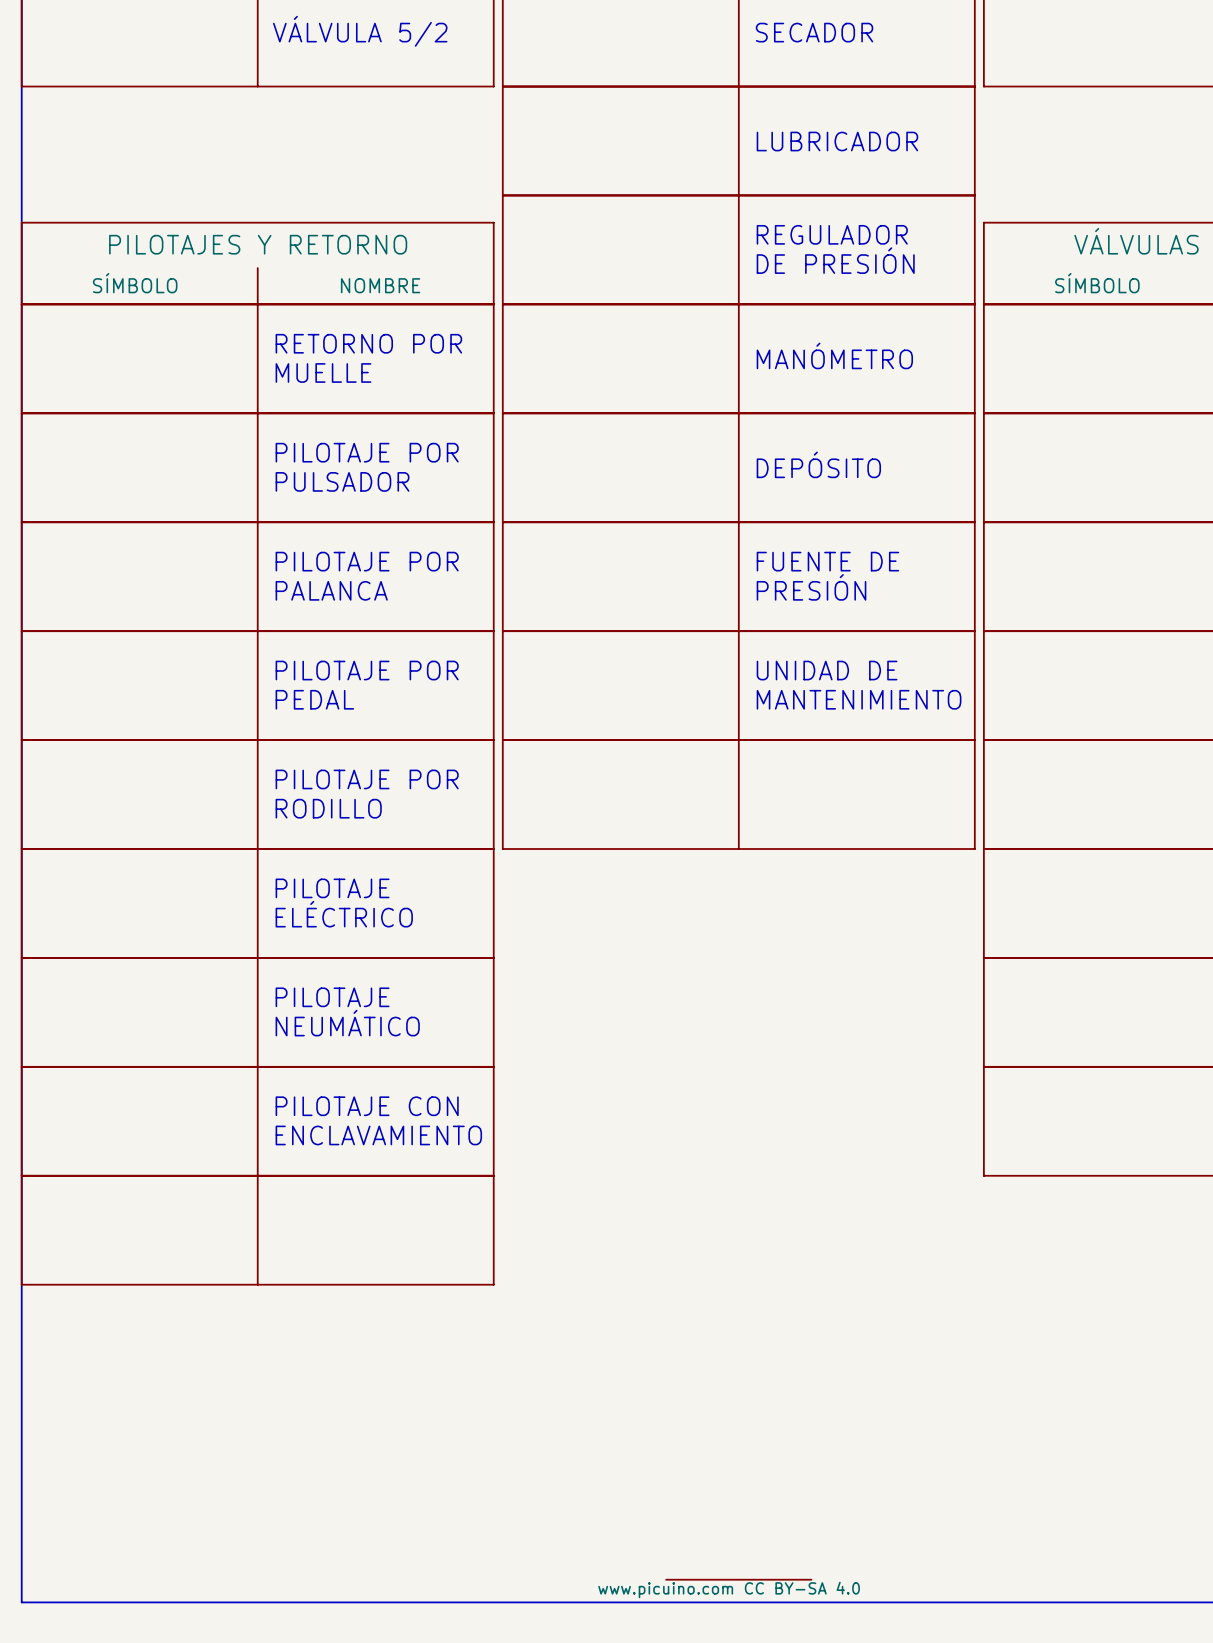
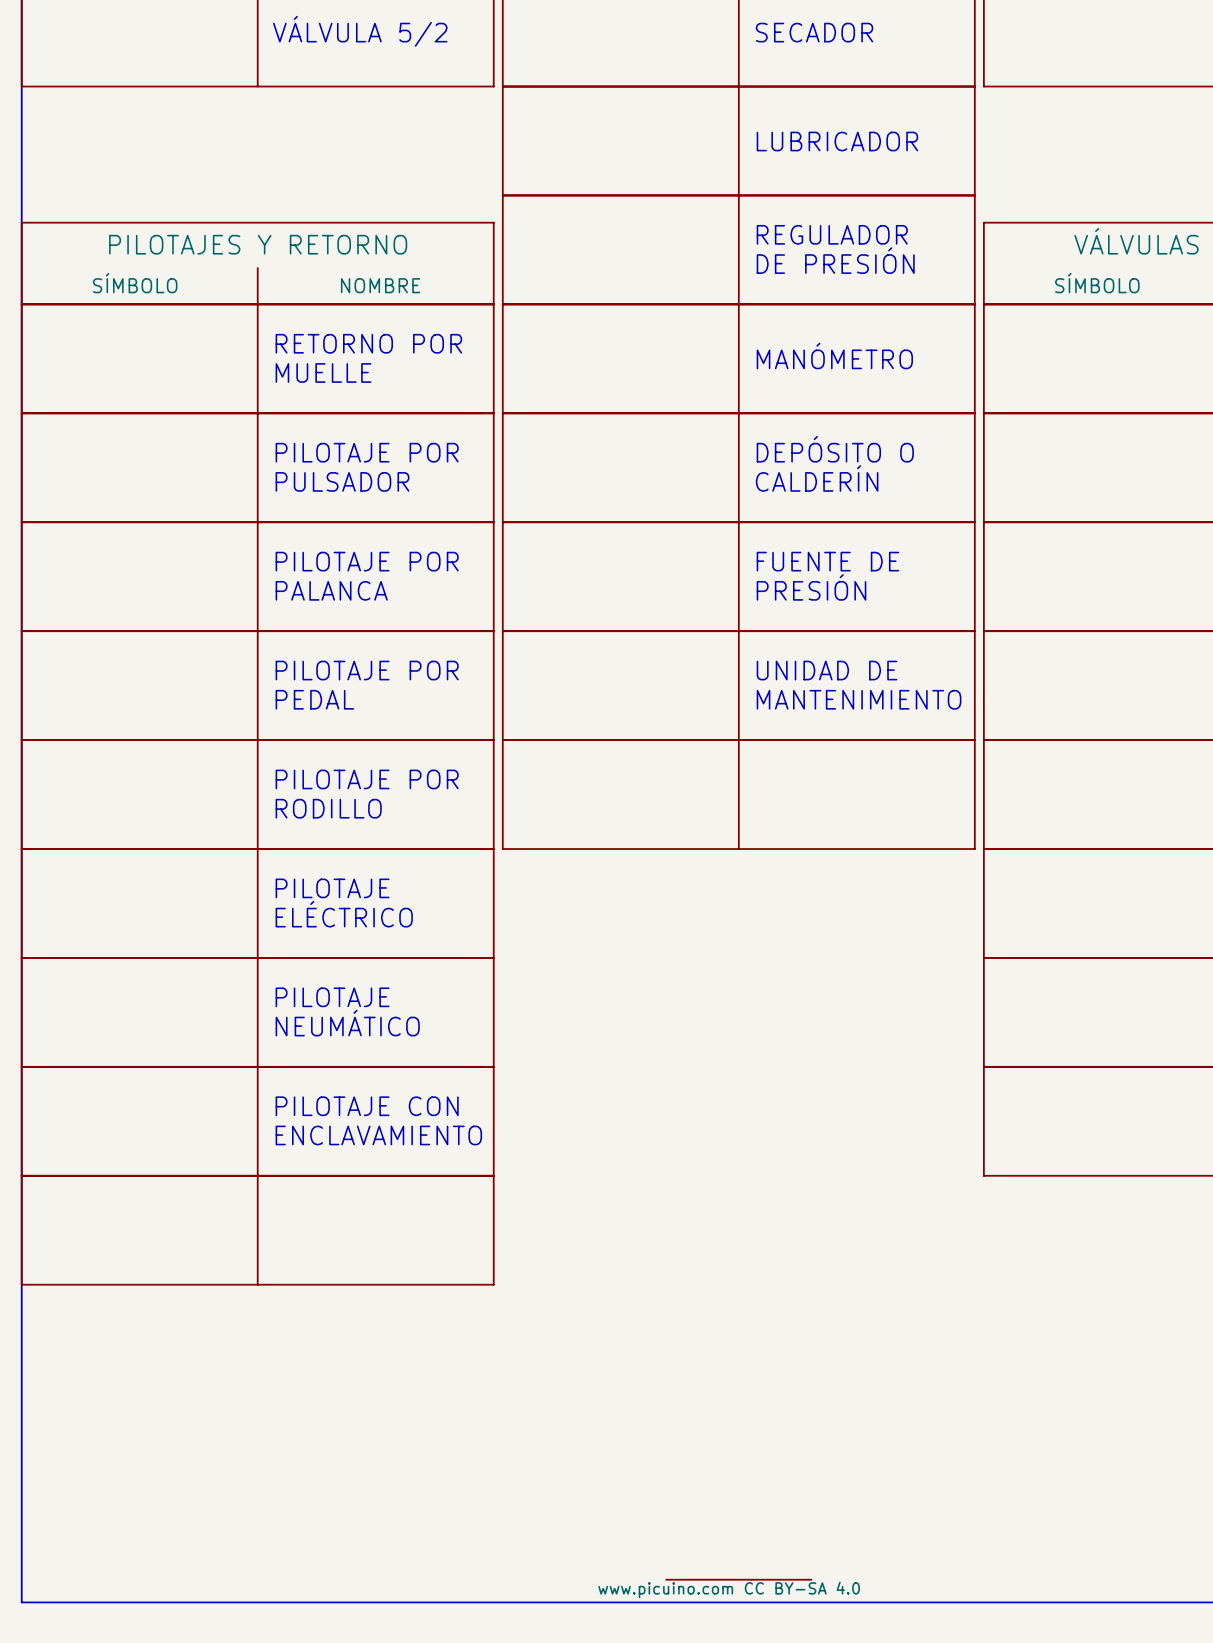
text: DEPÓSITO (818, 464) -> DEPÓSITO O (835, 449)
text: none -> CALDERÍN (817, 478)

